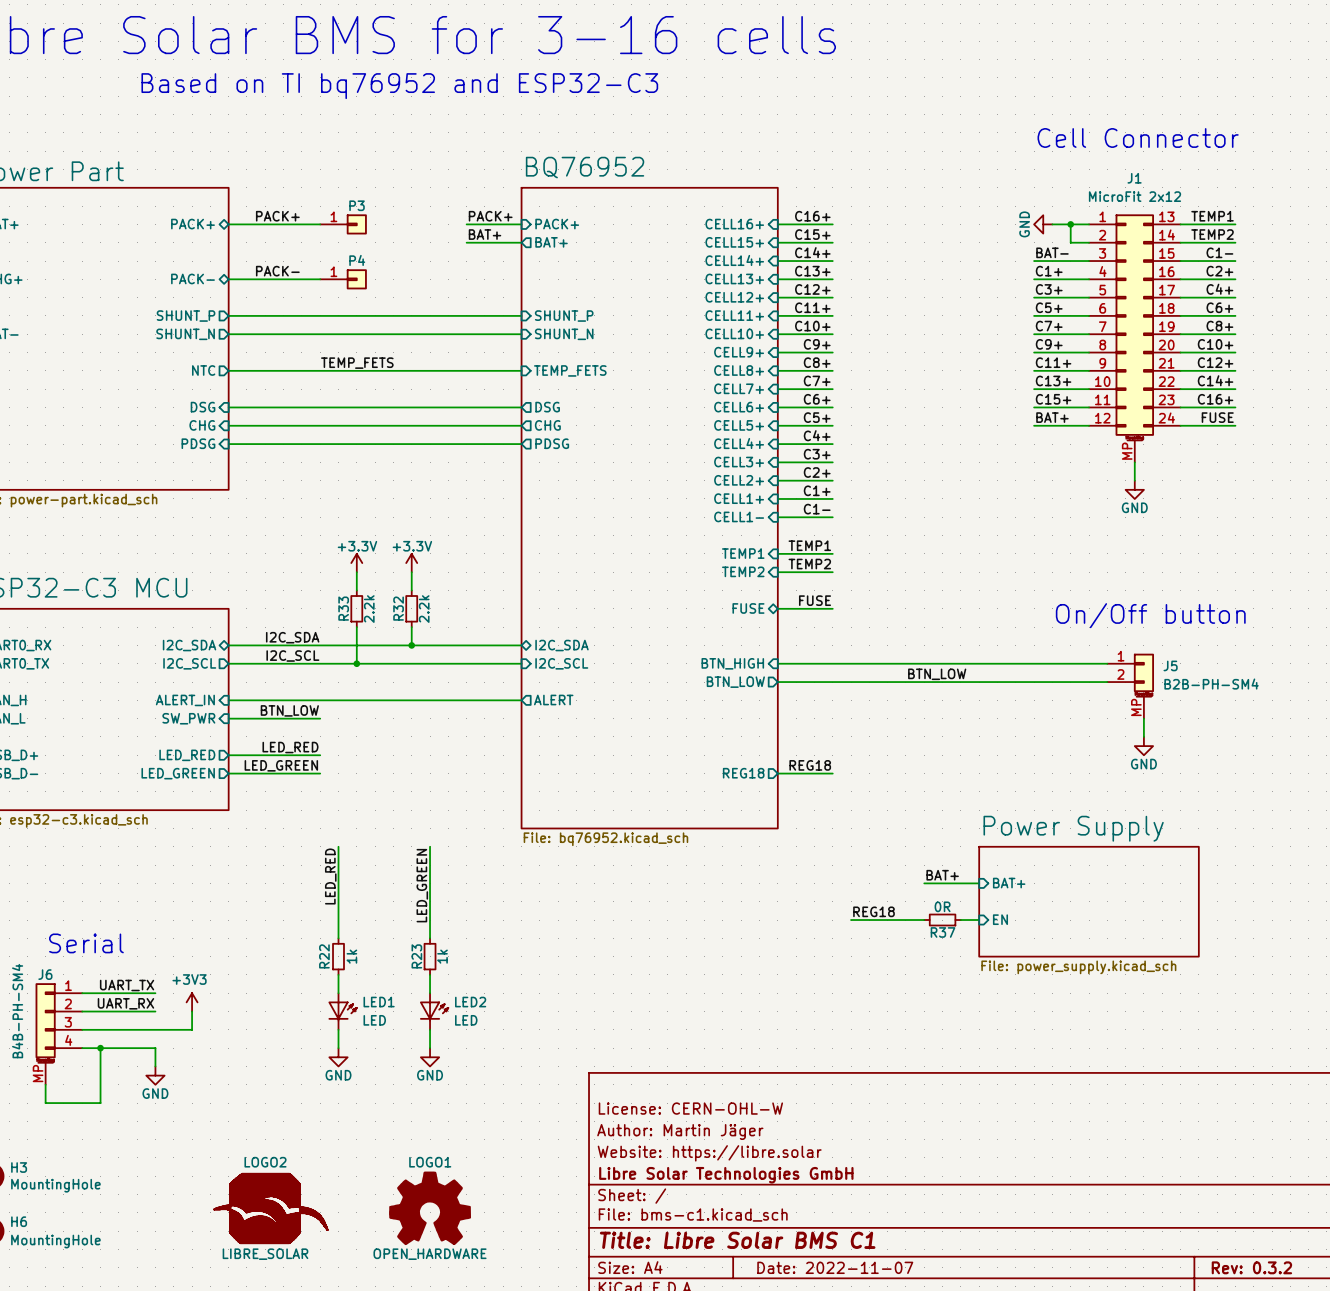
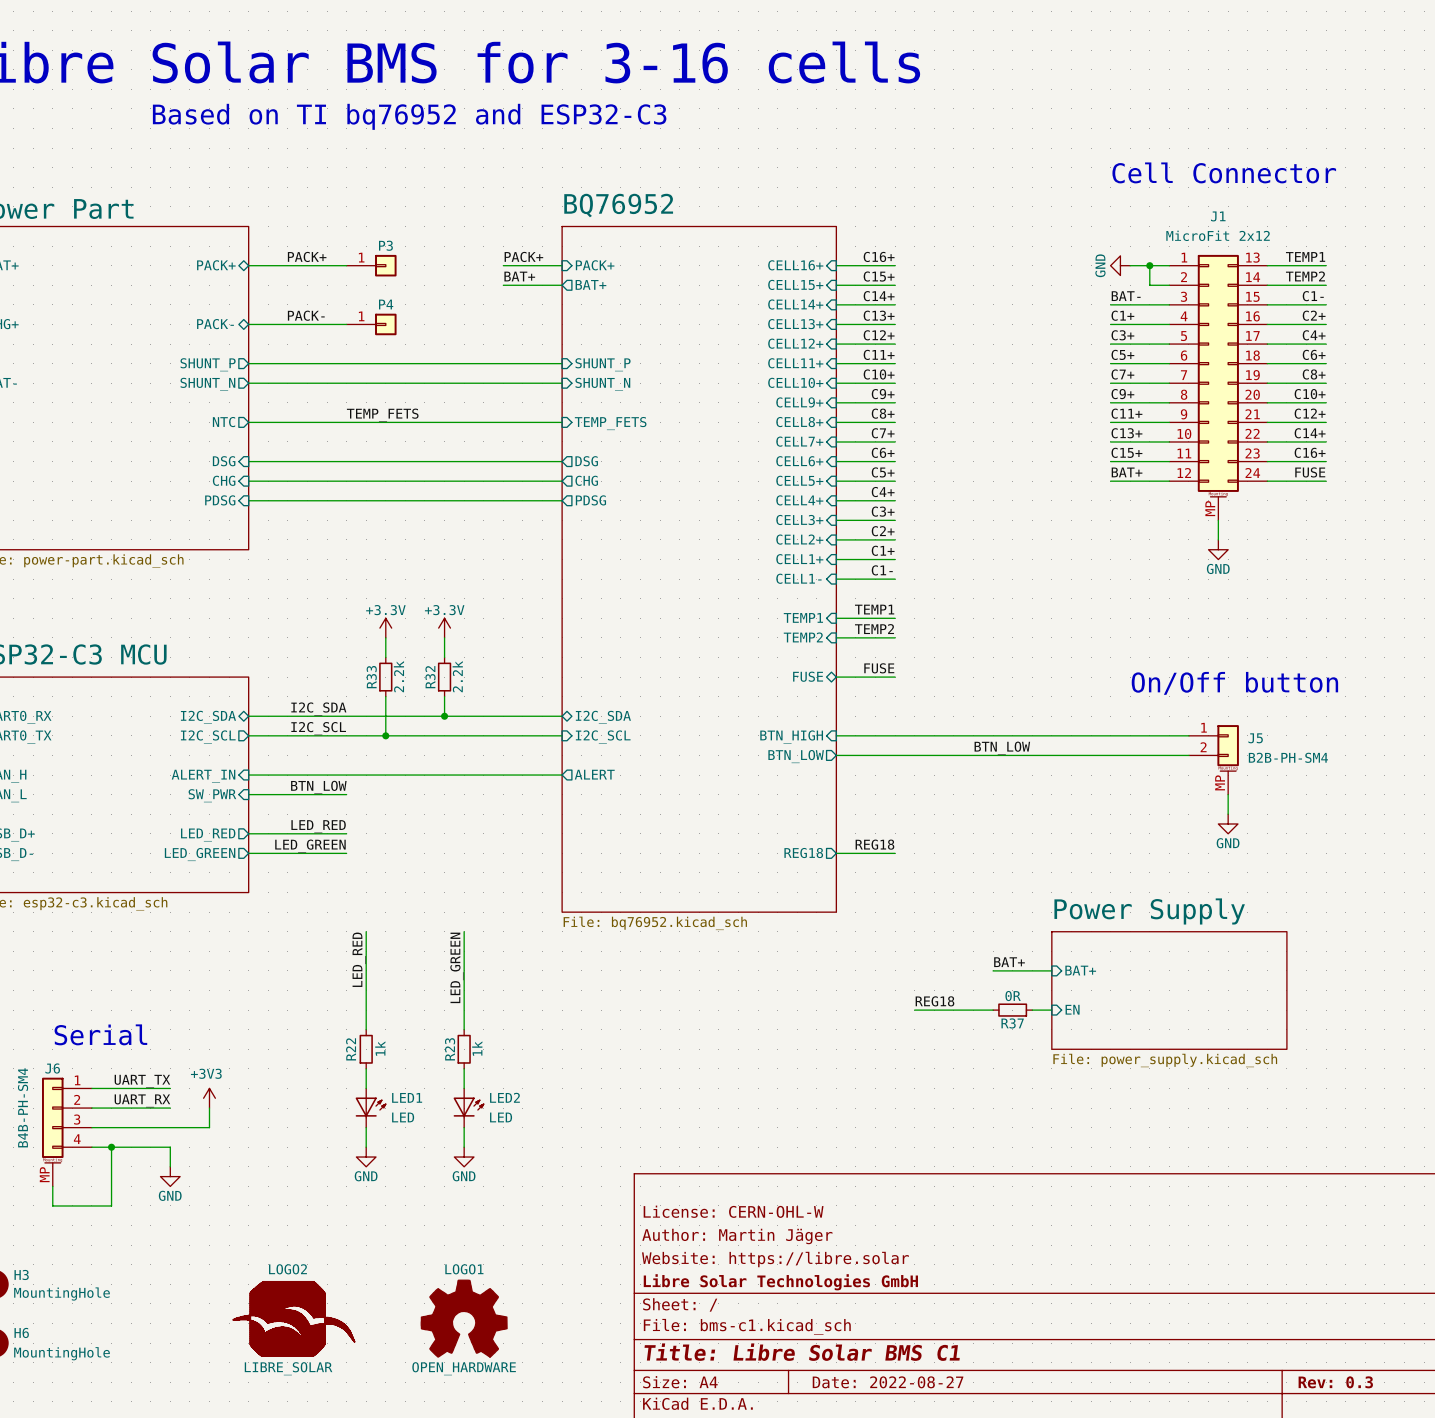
title block: Date: 2022-11-07 (835, 1267) -> Date: 2022-08-27 (888, 1382)
title block: Rev: 0.3.2 (1251, 1267) -> Rev: 0.3 (1335, 1382)

